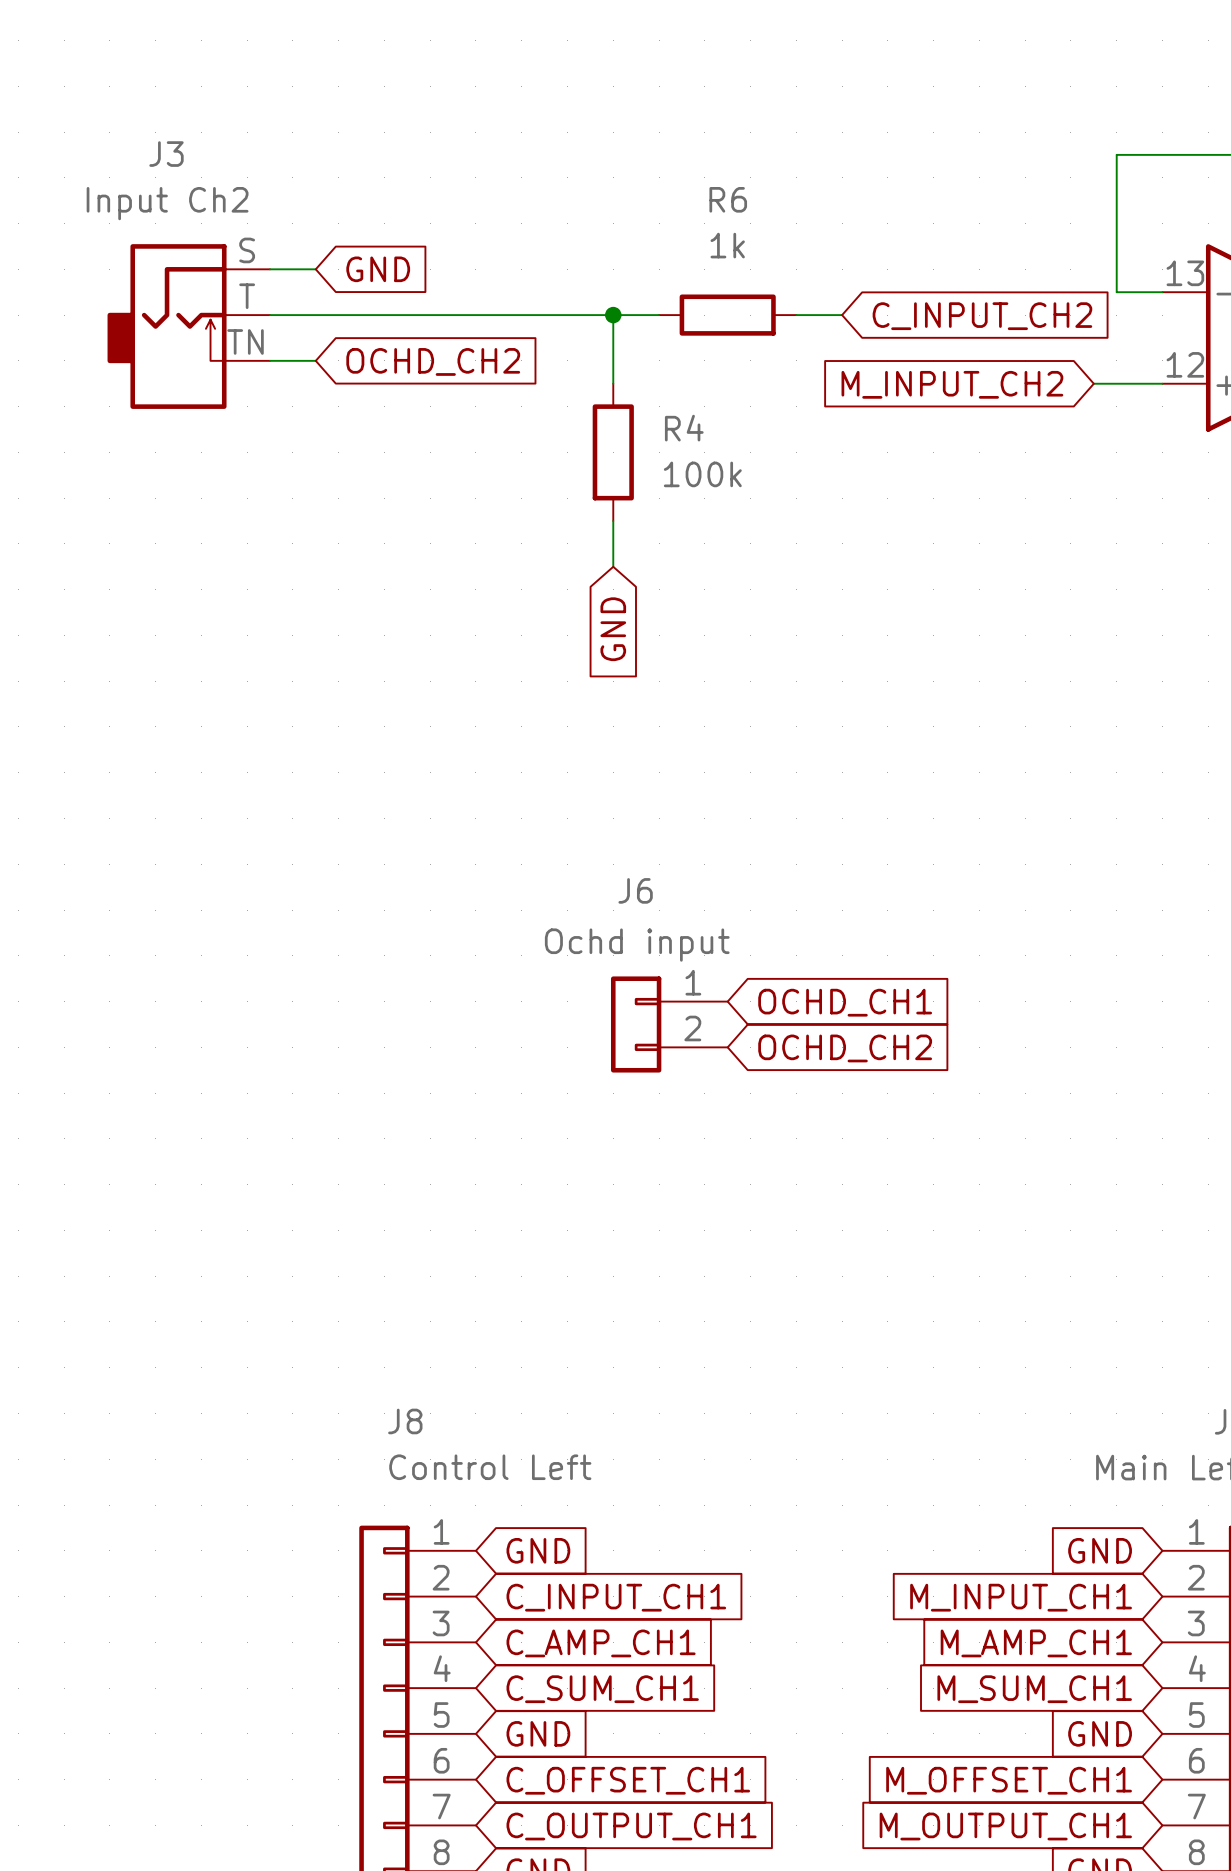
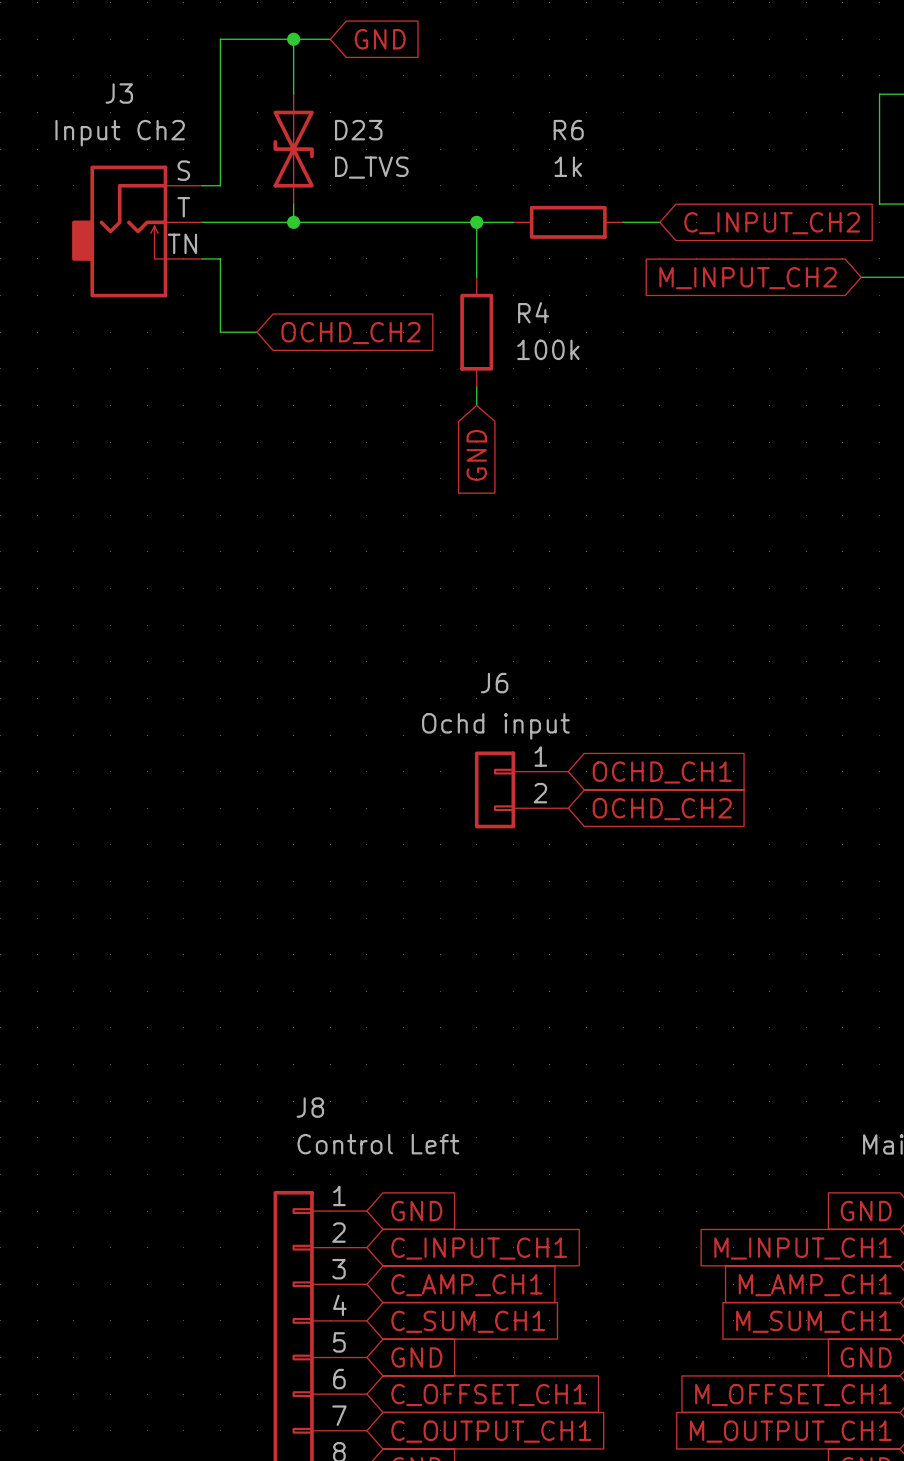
wire: none -> (293, 39) (293, 94)
junction: none -> (293, 39)
global label: none -> GND (380, 39)
D23: none -> D_TVS (293, 149)
wire: (292, 269) (315, 269) -> (220, 185) (220, 39) (330, 39)
global label: GND (378, 269) -> none
junction: none -> (293, 222)
wire: (292, 360) (315, 360) -> (220, 258) (220, 332) (257, 332)
global label position: OCHD_CH2 (433, 361) -> OCHD_CH2 (350, 333)
wire: (613, 543) (613, 566) -> (293, 204) (293, 222)
global label position: GND (613, 629) -> GND (476, 455)

